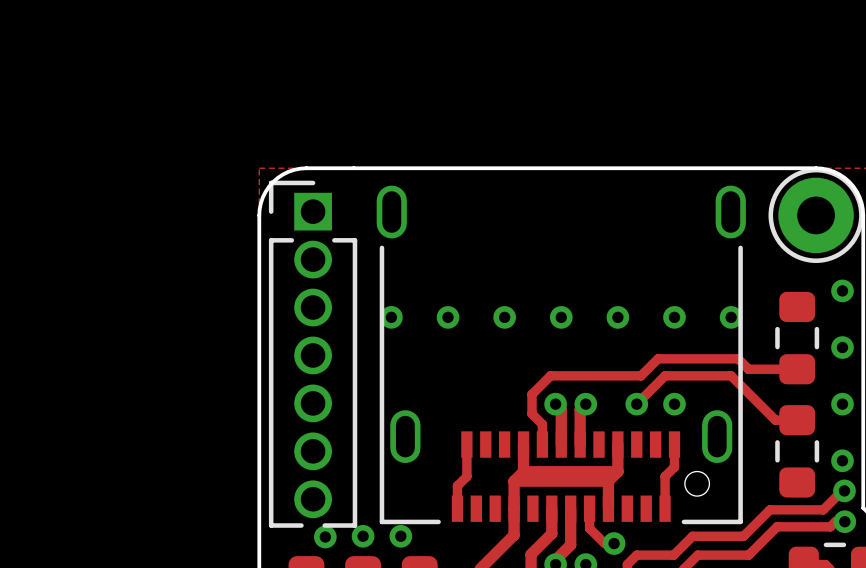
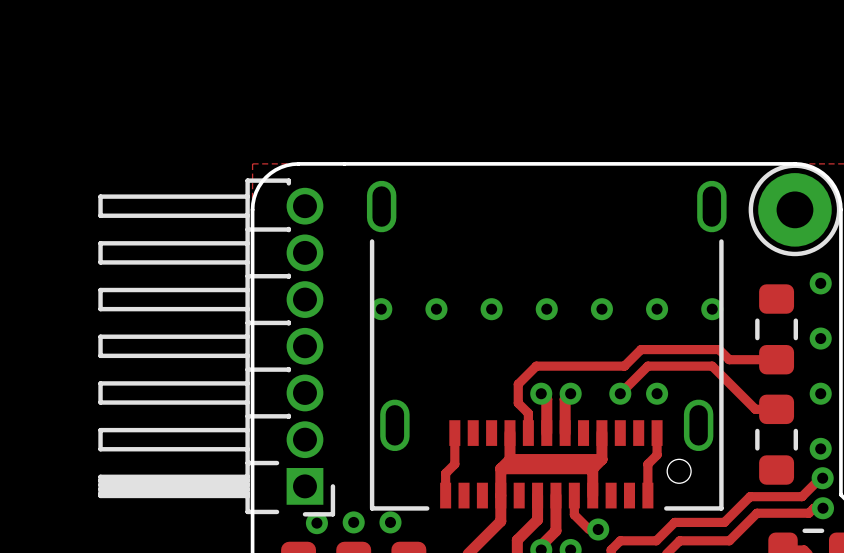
part: (313, 354) -> none
part: none -> (216, 347)

